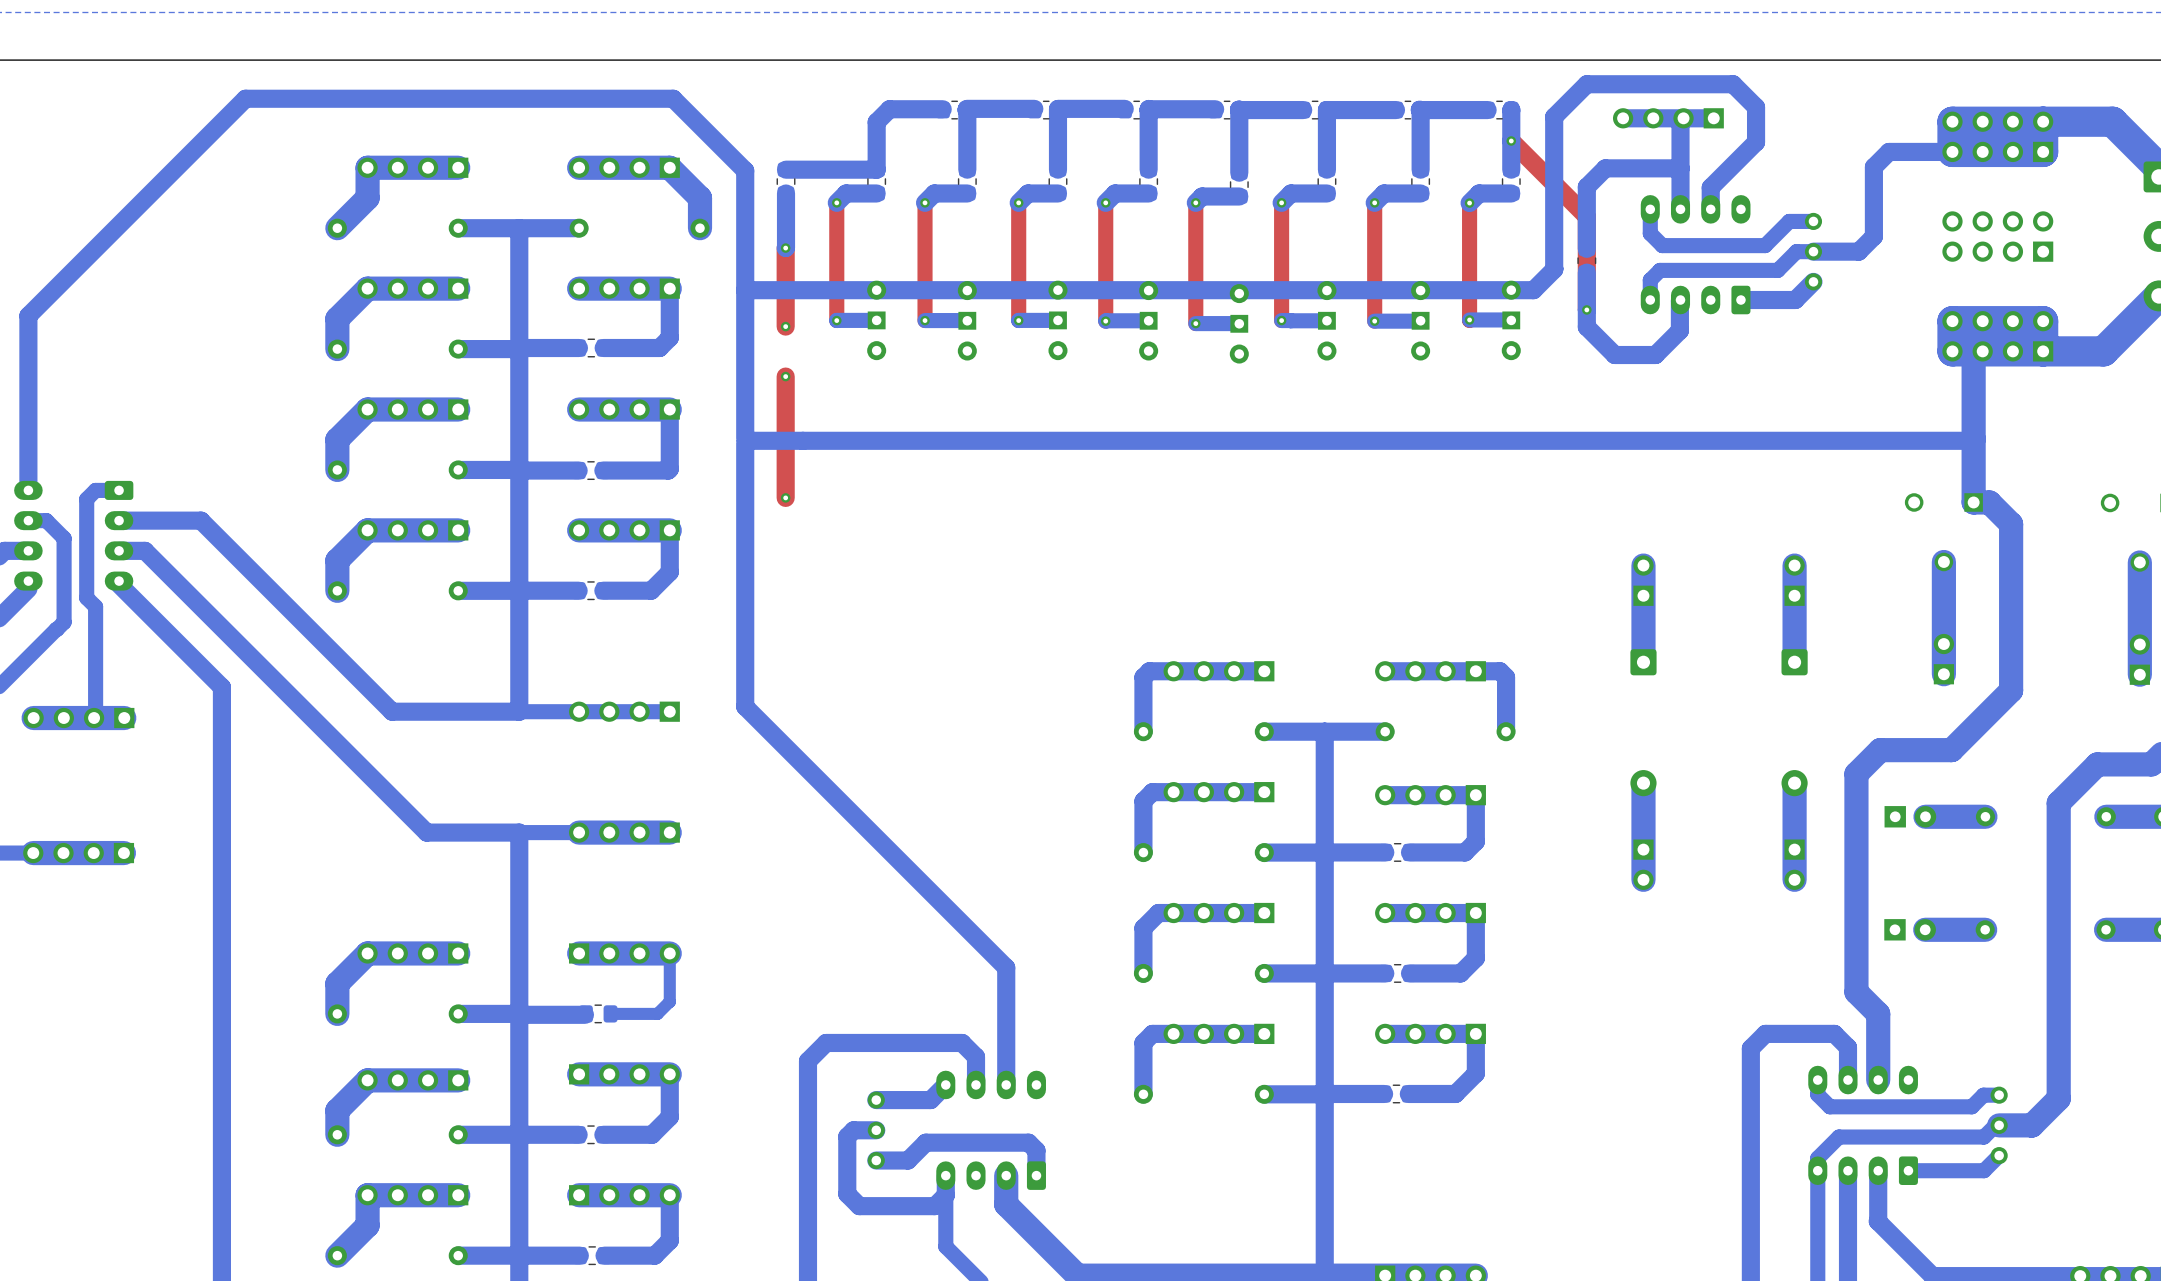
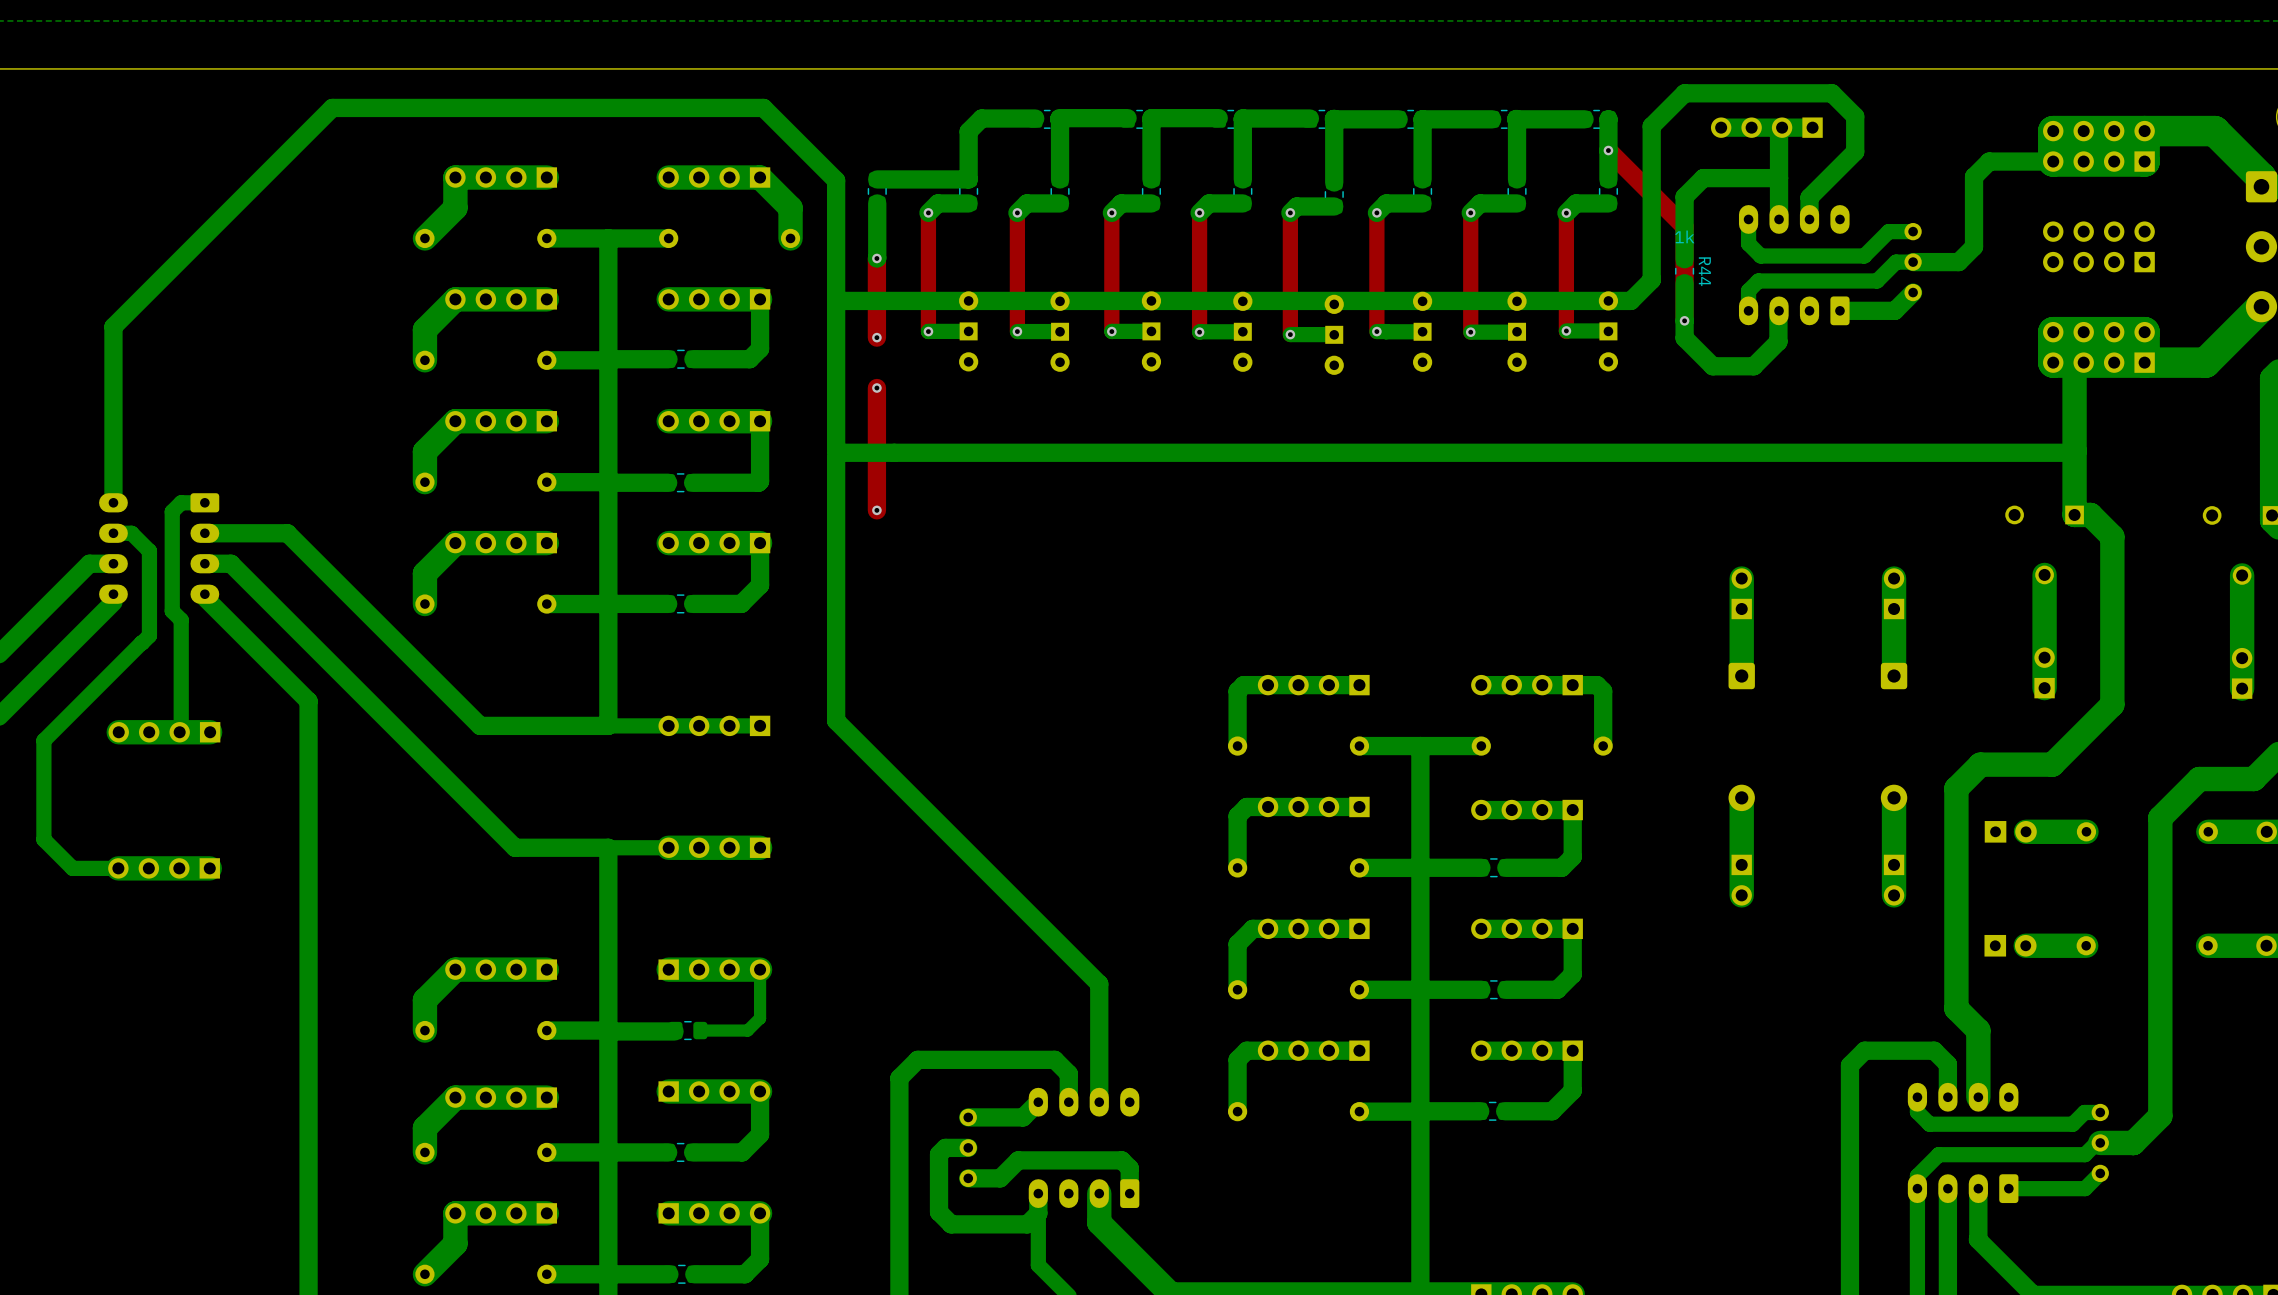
R44 value: none -> 1k (1684, 236)
R44 name: none -> R44 (1704, 271)

